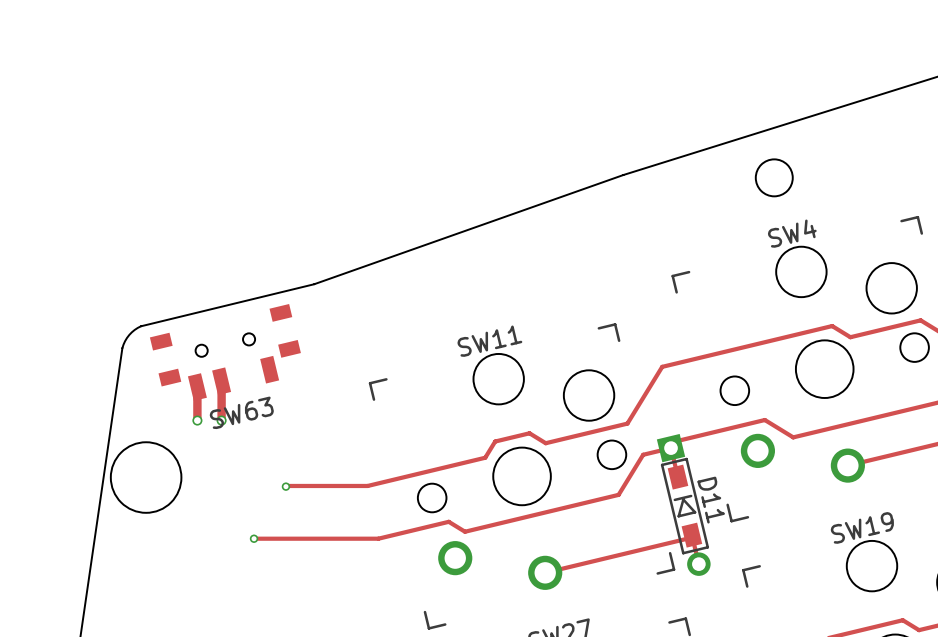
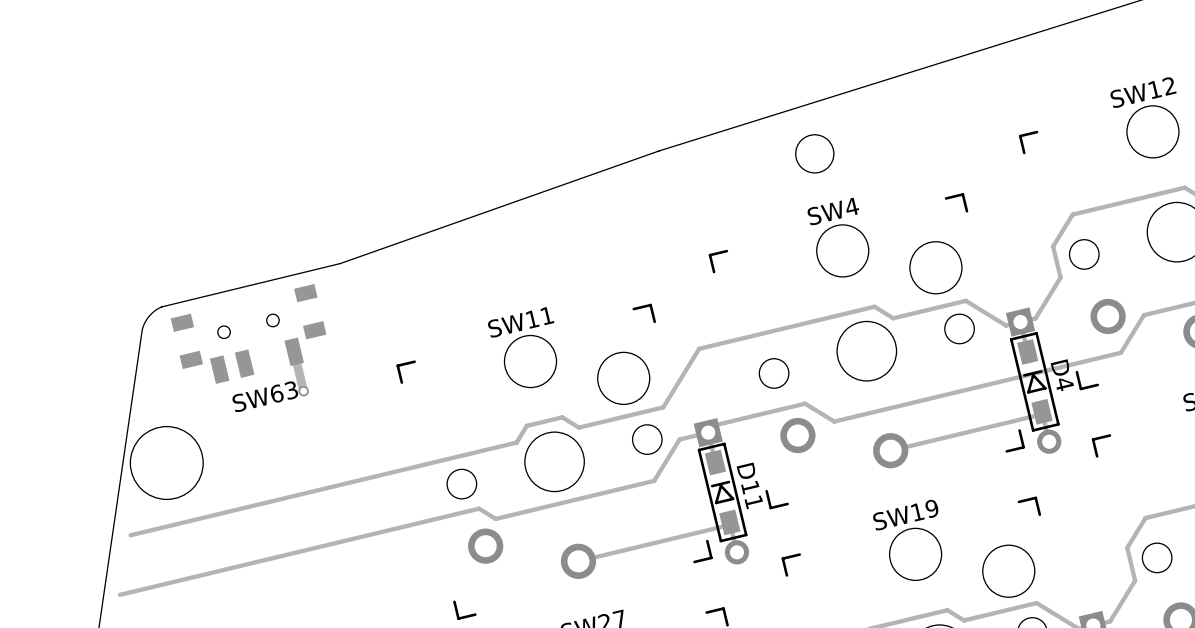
track: none -> (294, 351) (303, 391)
track: (221, 381) (221, 420) -> none
track: (197, 387) (197, 420) -> none
via: none -> (303, 391)
via: (197, 420) -> none
via: (221, 420) -> none
track: (286, 485) (367, 485) -> (130, 535) (395, 471)
via: (285, 486) -> none
track: (254, 538) (378, 538) -> (119, 594) (406, 526)
via: (254, 538) -> none

